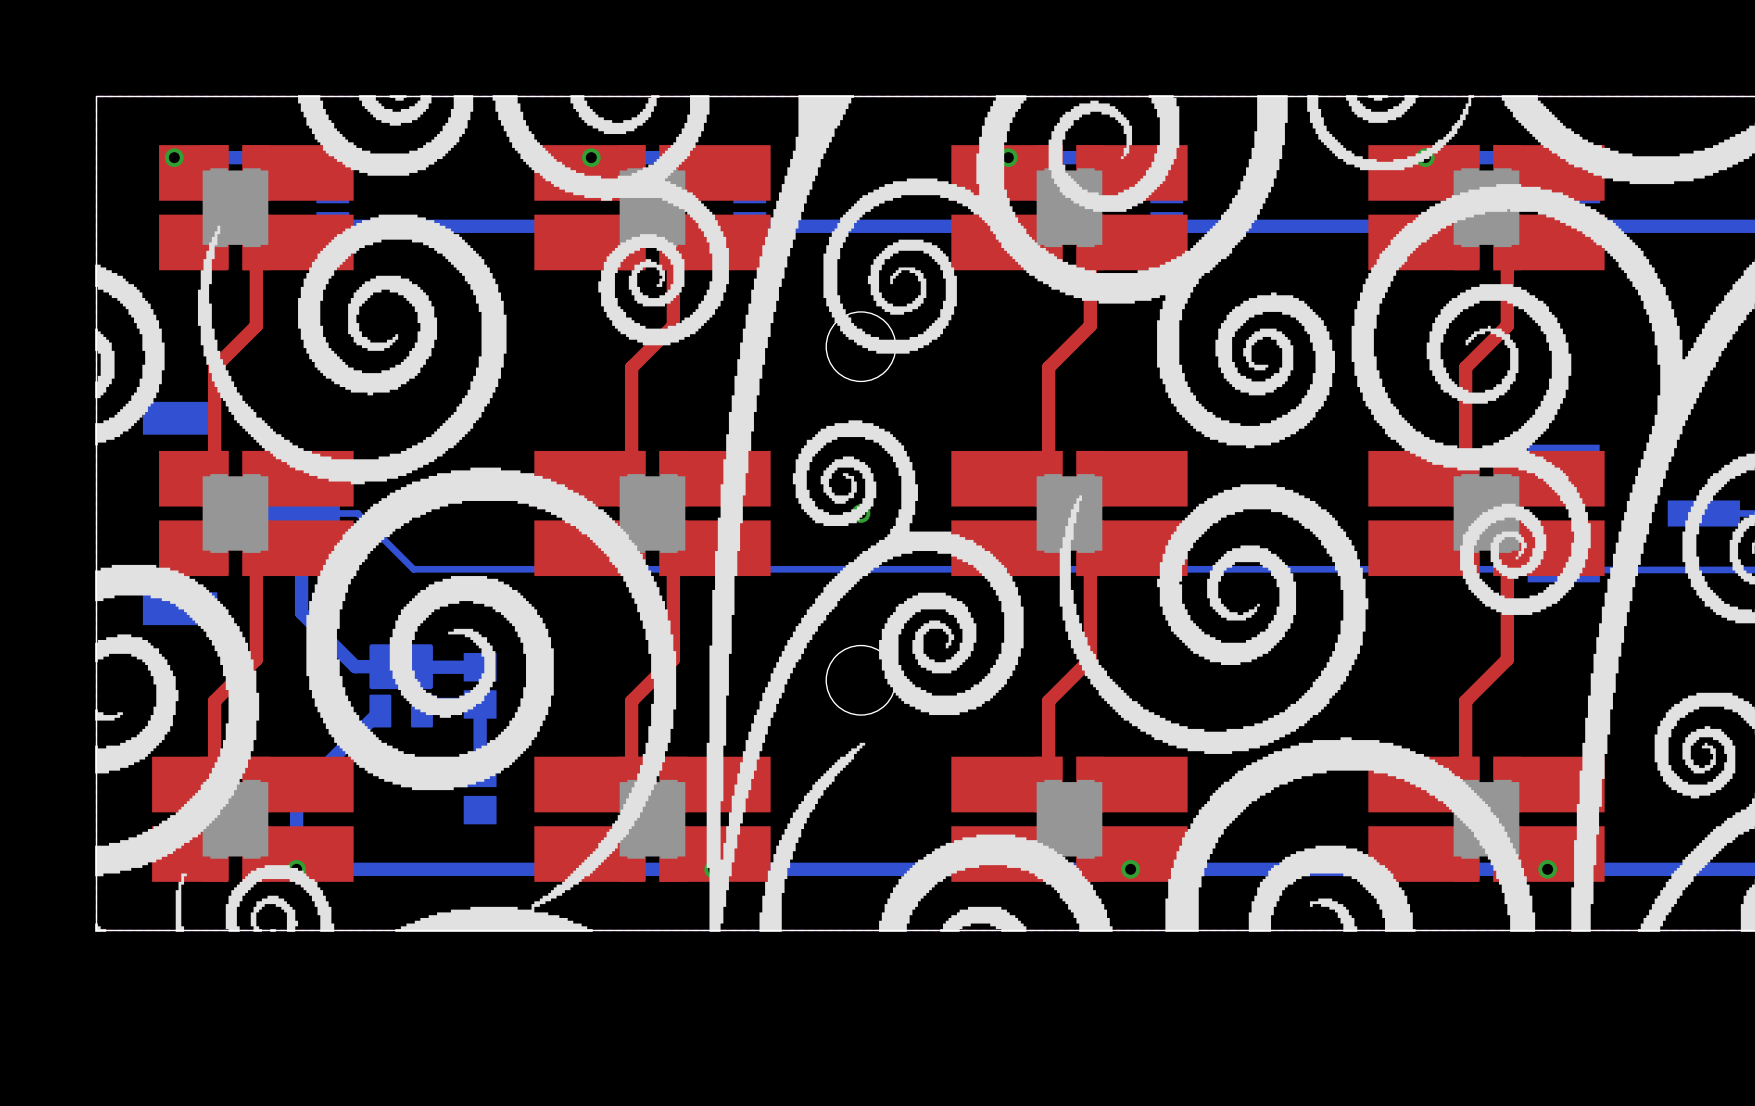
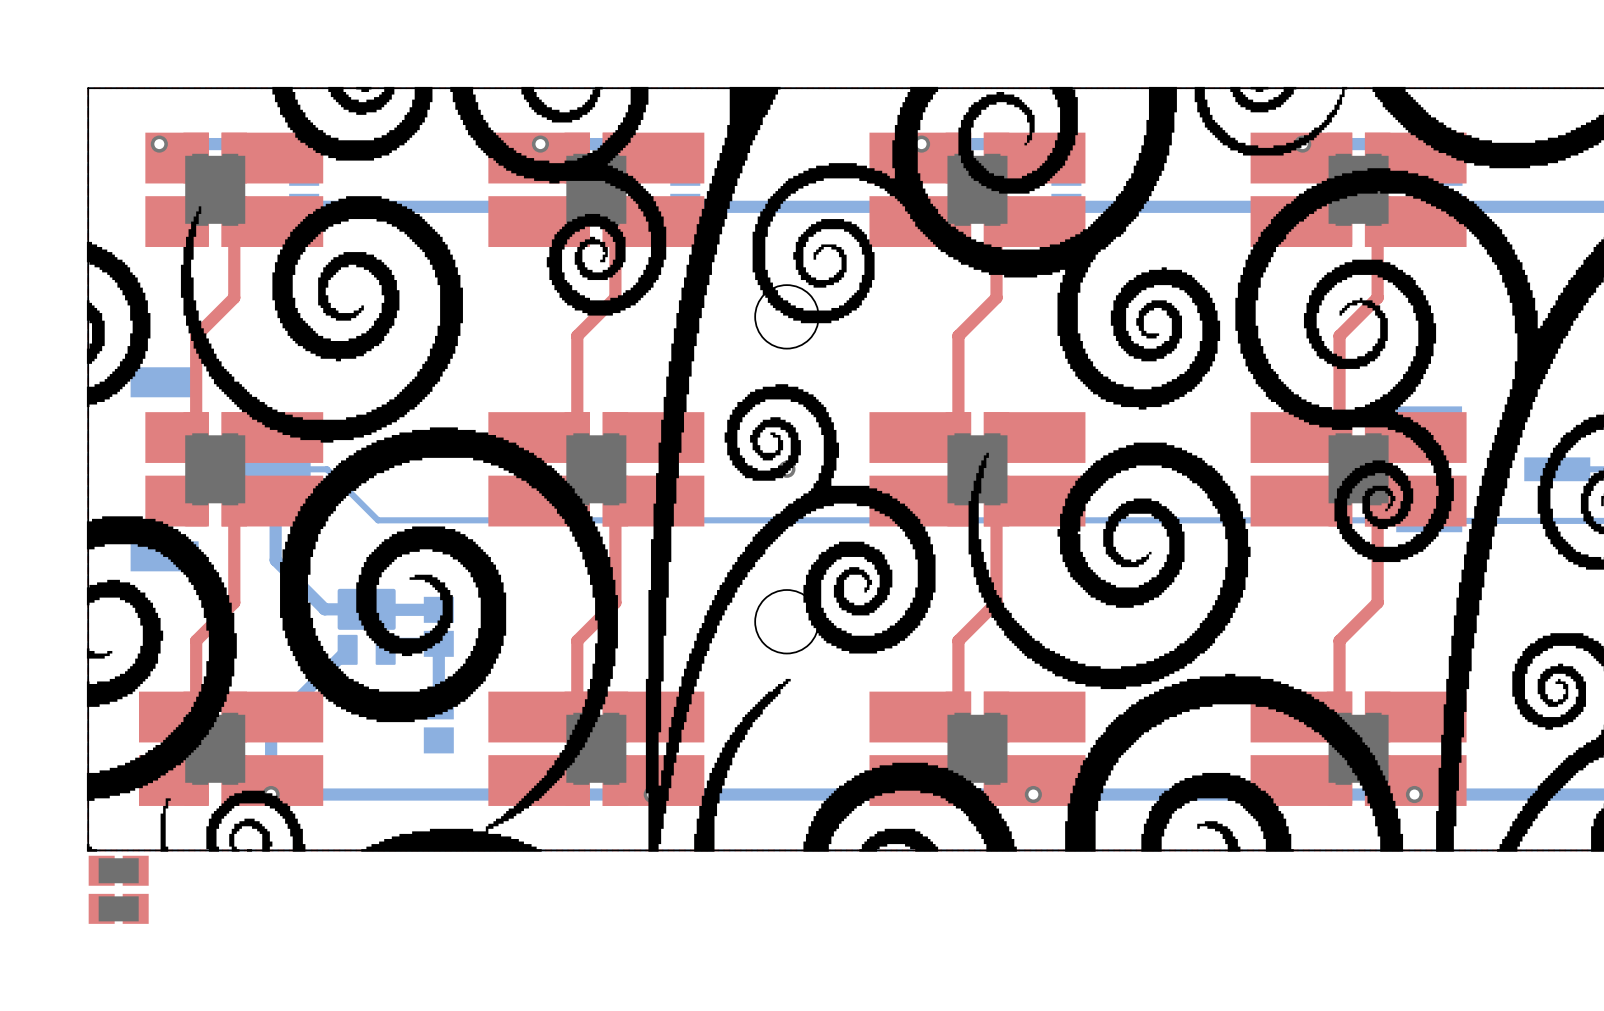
part: none -> (118, 870)
part: none -> (118, 908)

